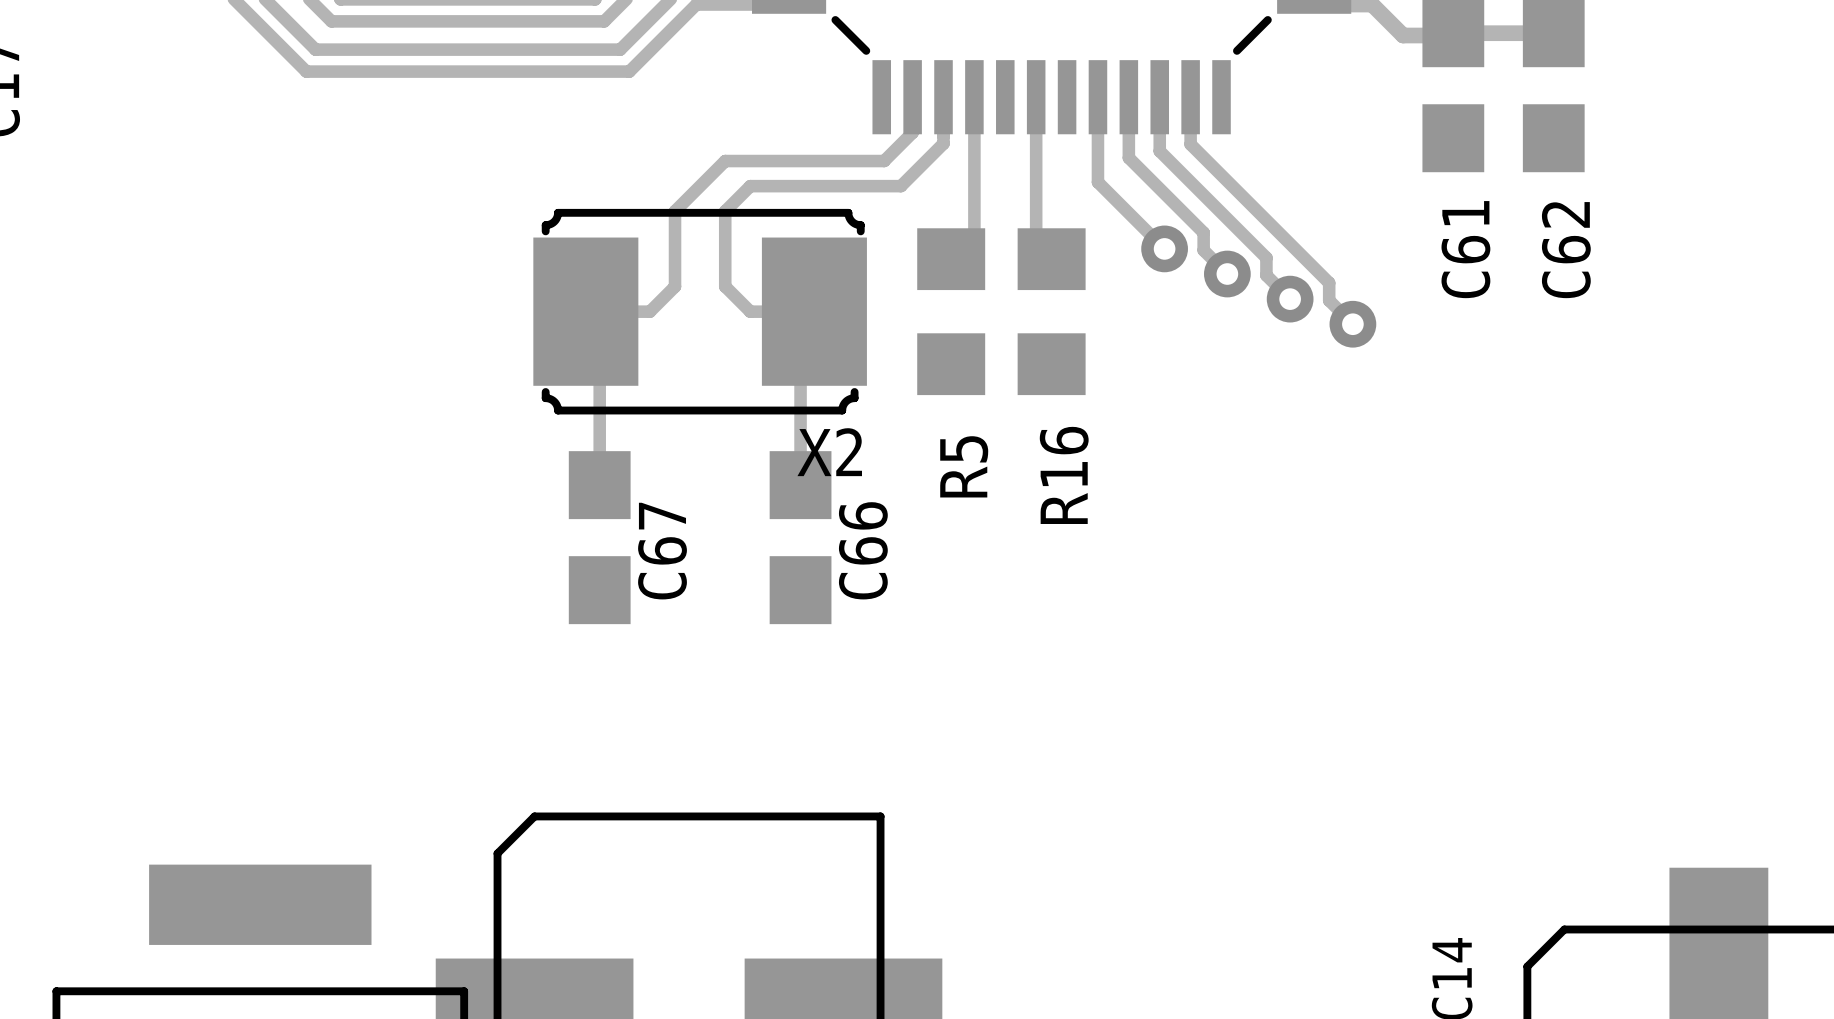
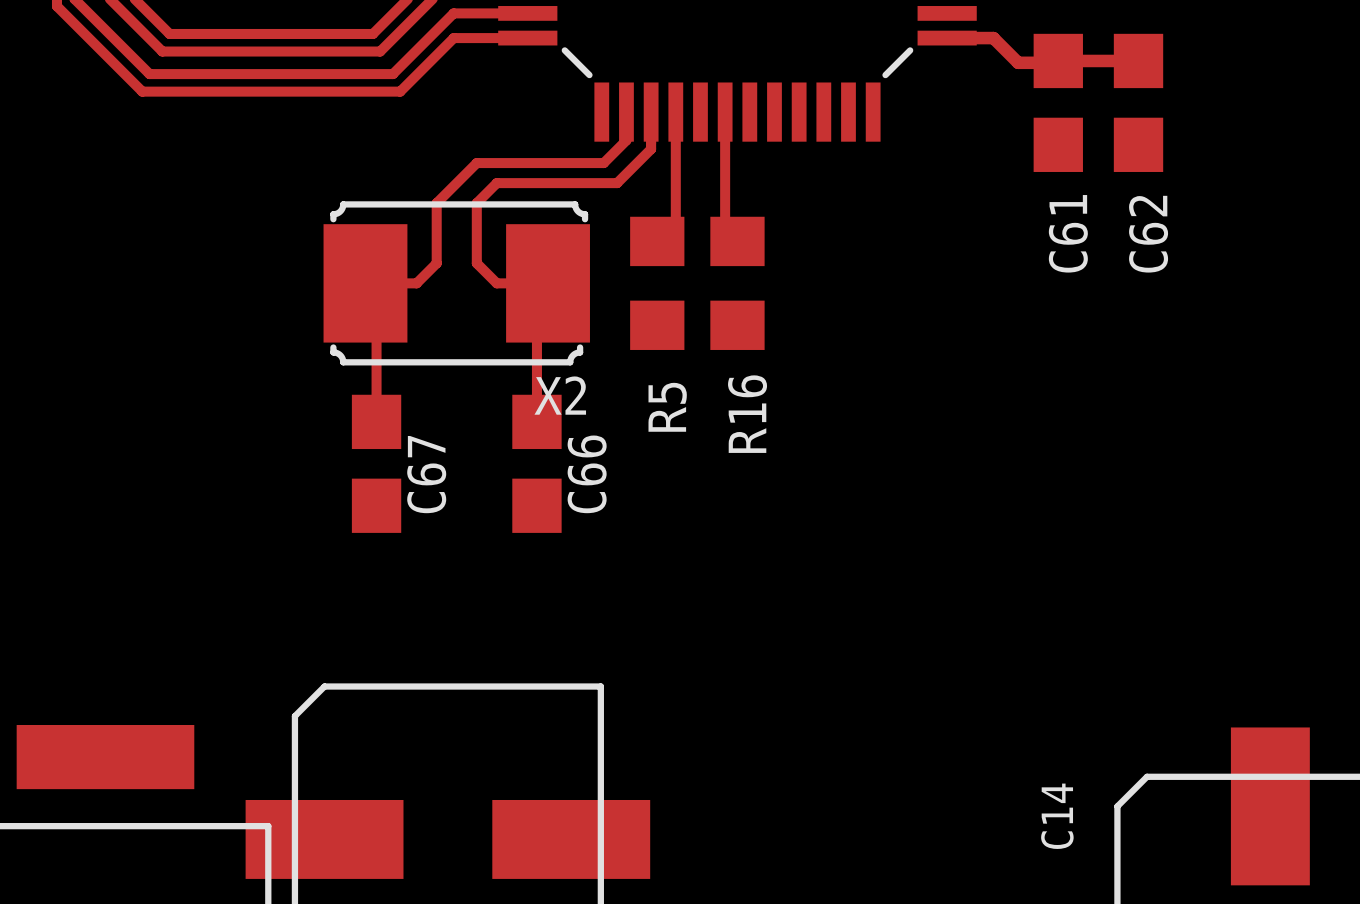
track: (1097, 97) (1097, 182) (1164, 248) -> none
track: (1128, 97) (1128, 157) (1203, 232) (1203, 250) (1227, 274) -> none
track: (1159, 97) (1159, 151) (1266, 257) (1266, 275) (1290, 299) -> none
track: (1190, 97) (1190, 144) (1329, 282) (1329, 300) (1352, 324) -> none
via: (1164, 248) -> none
via: (1227, 274) -> none
via: (1290, 299) -> none
via: (1352, 324) -> none

